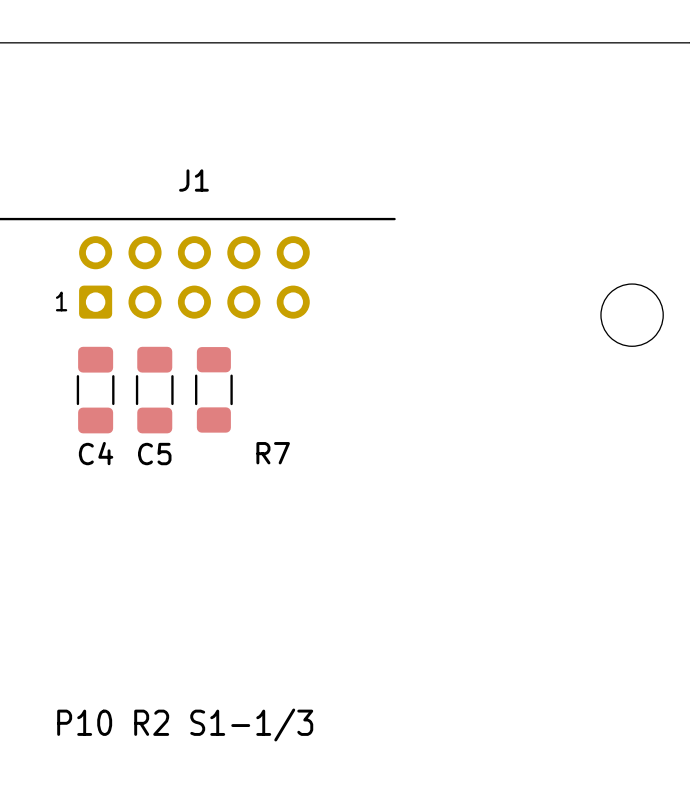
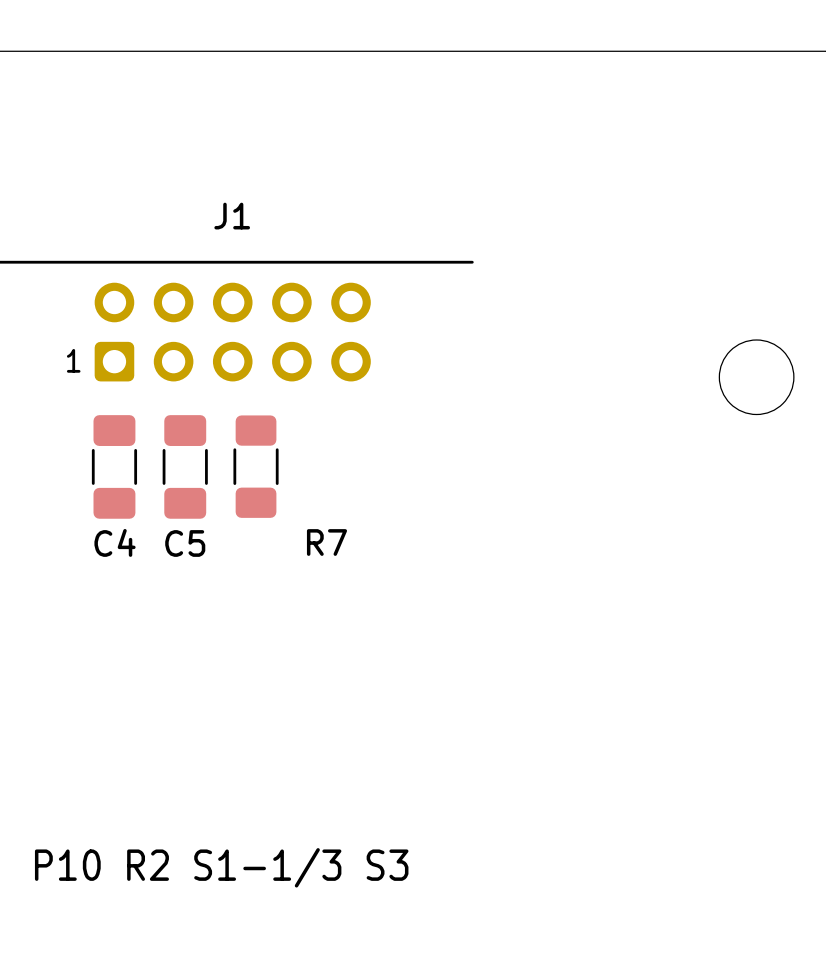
text: P10 R2 S1-1/3 (185, 724) -> P10 R2 S1-1/3 S3 (221, 867)

